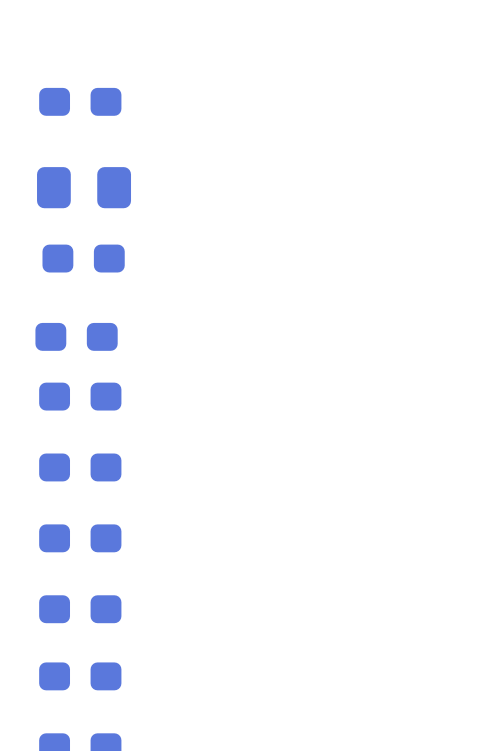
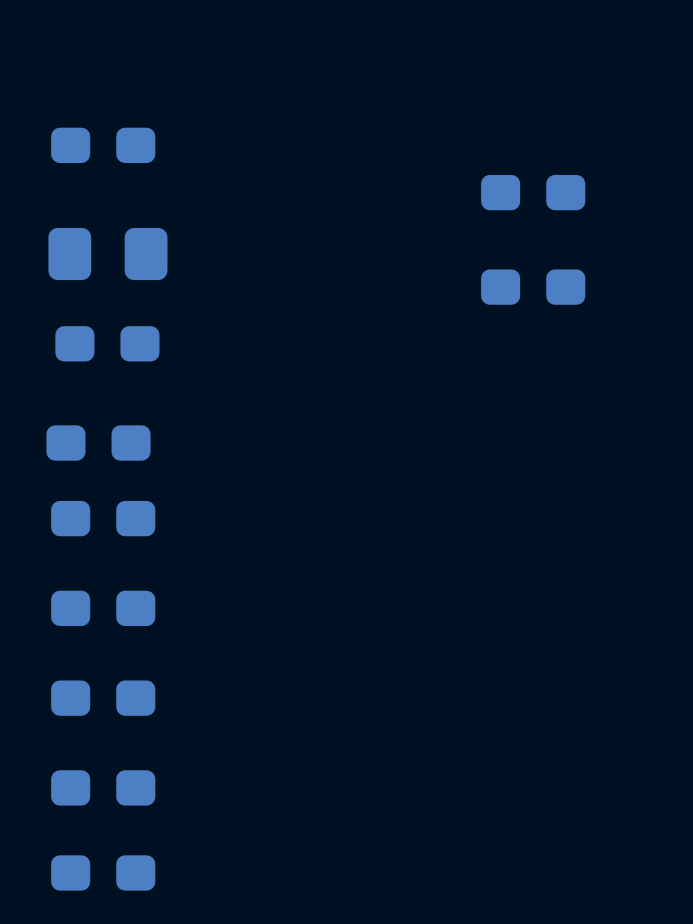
part: none -> (533, 192)
part: none -> (533, 287)

